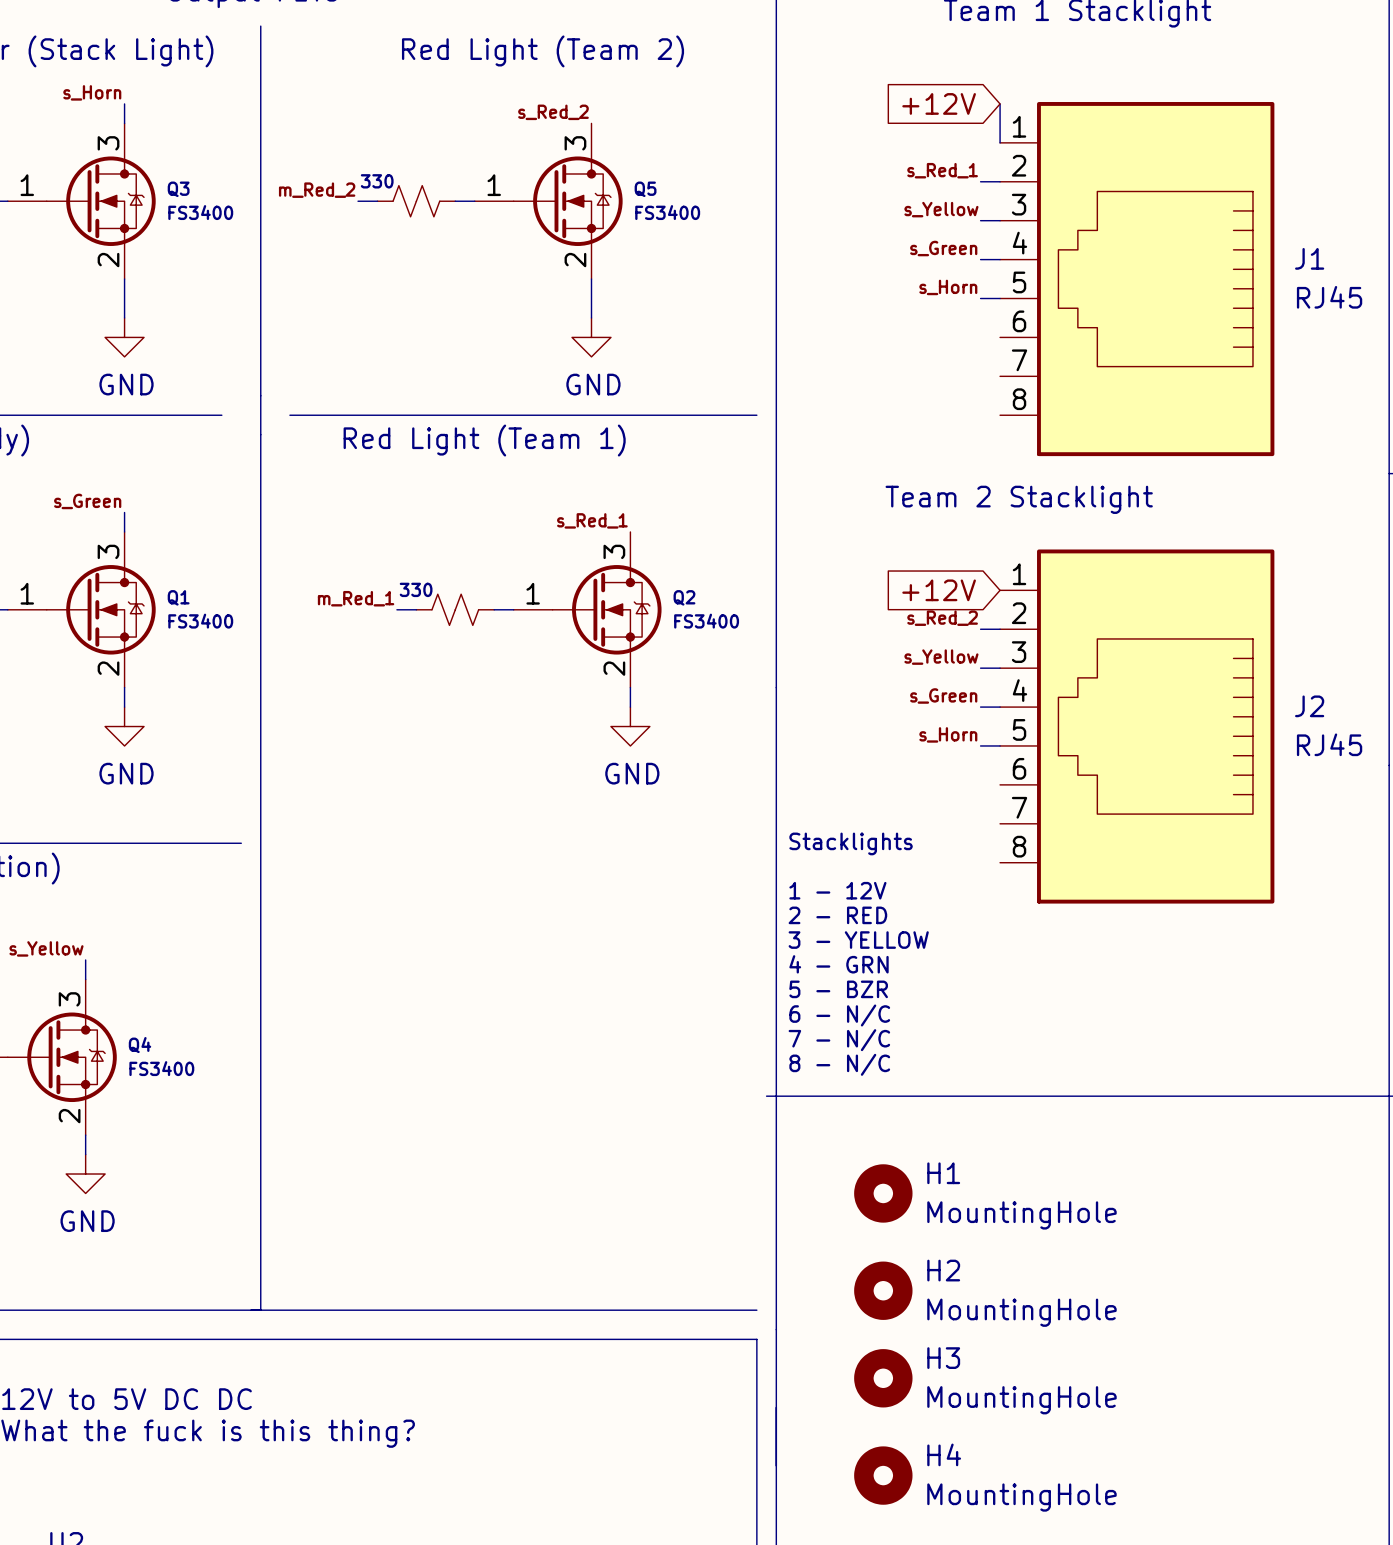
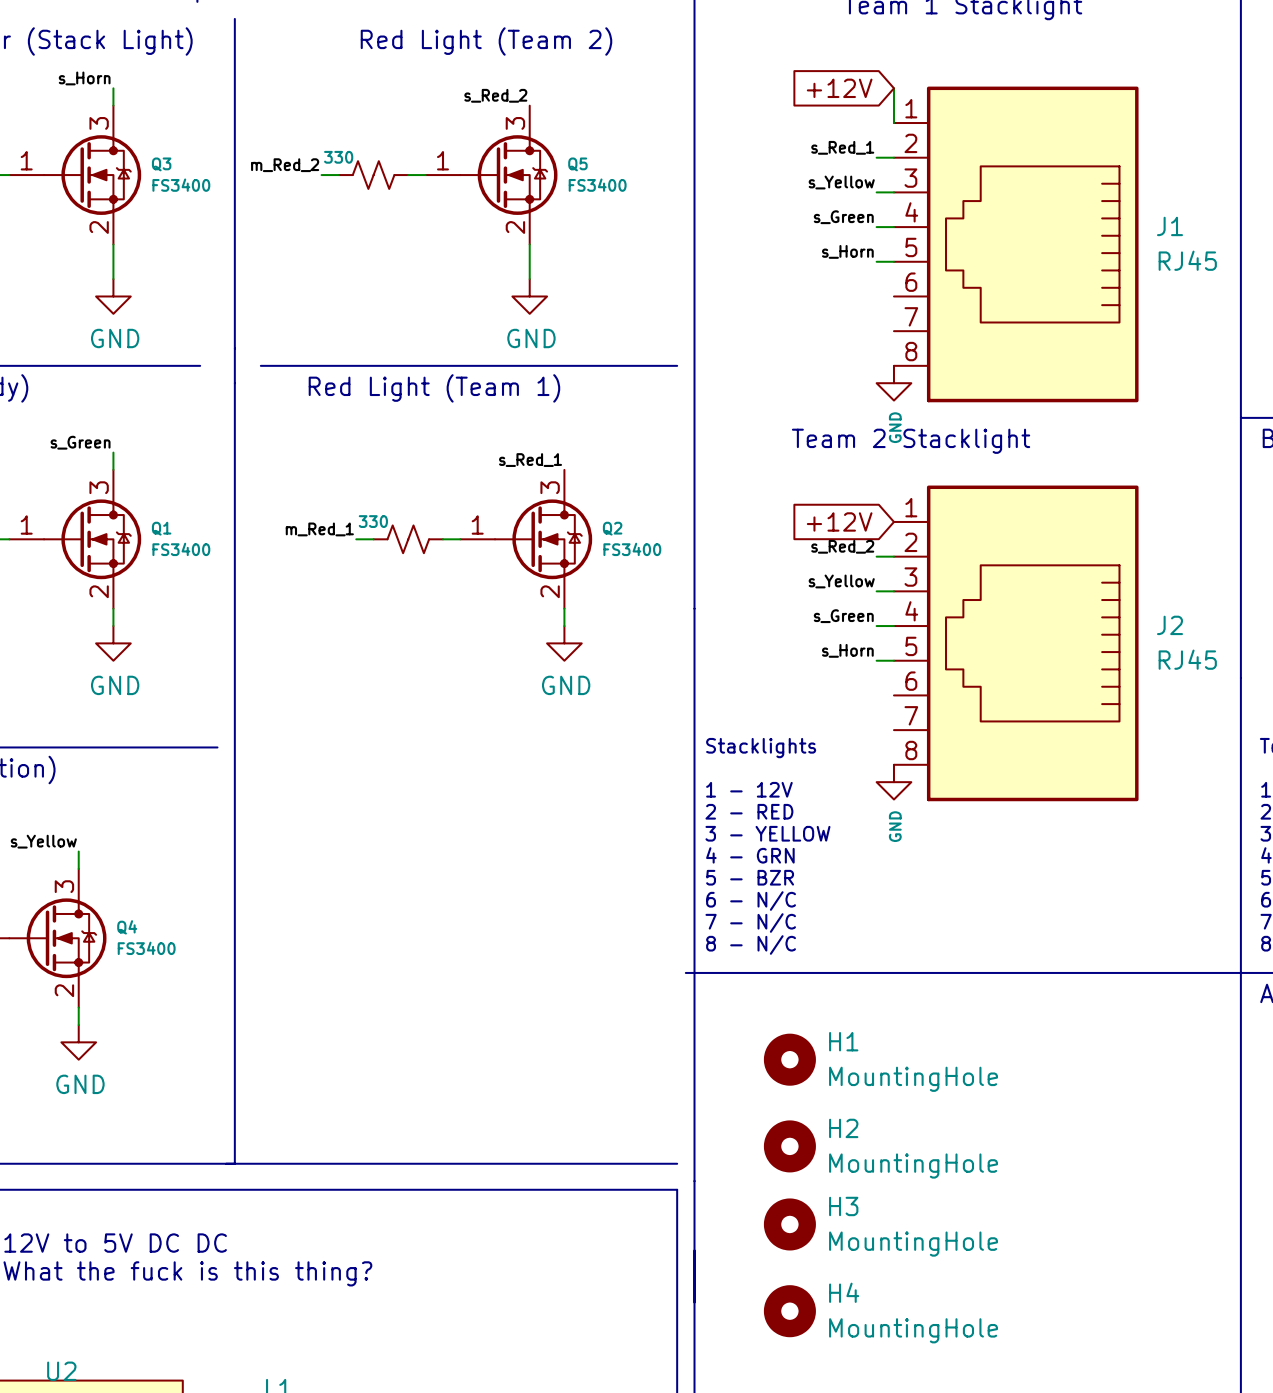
power symbol: none -> GND (893, 383)
power symbol: none -> GND (893, 782)

